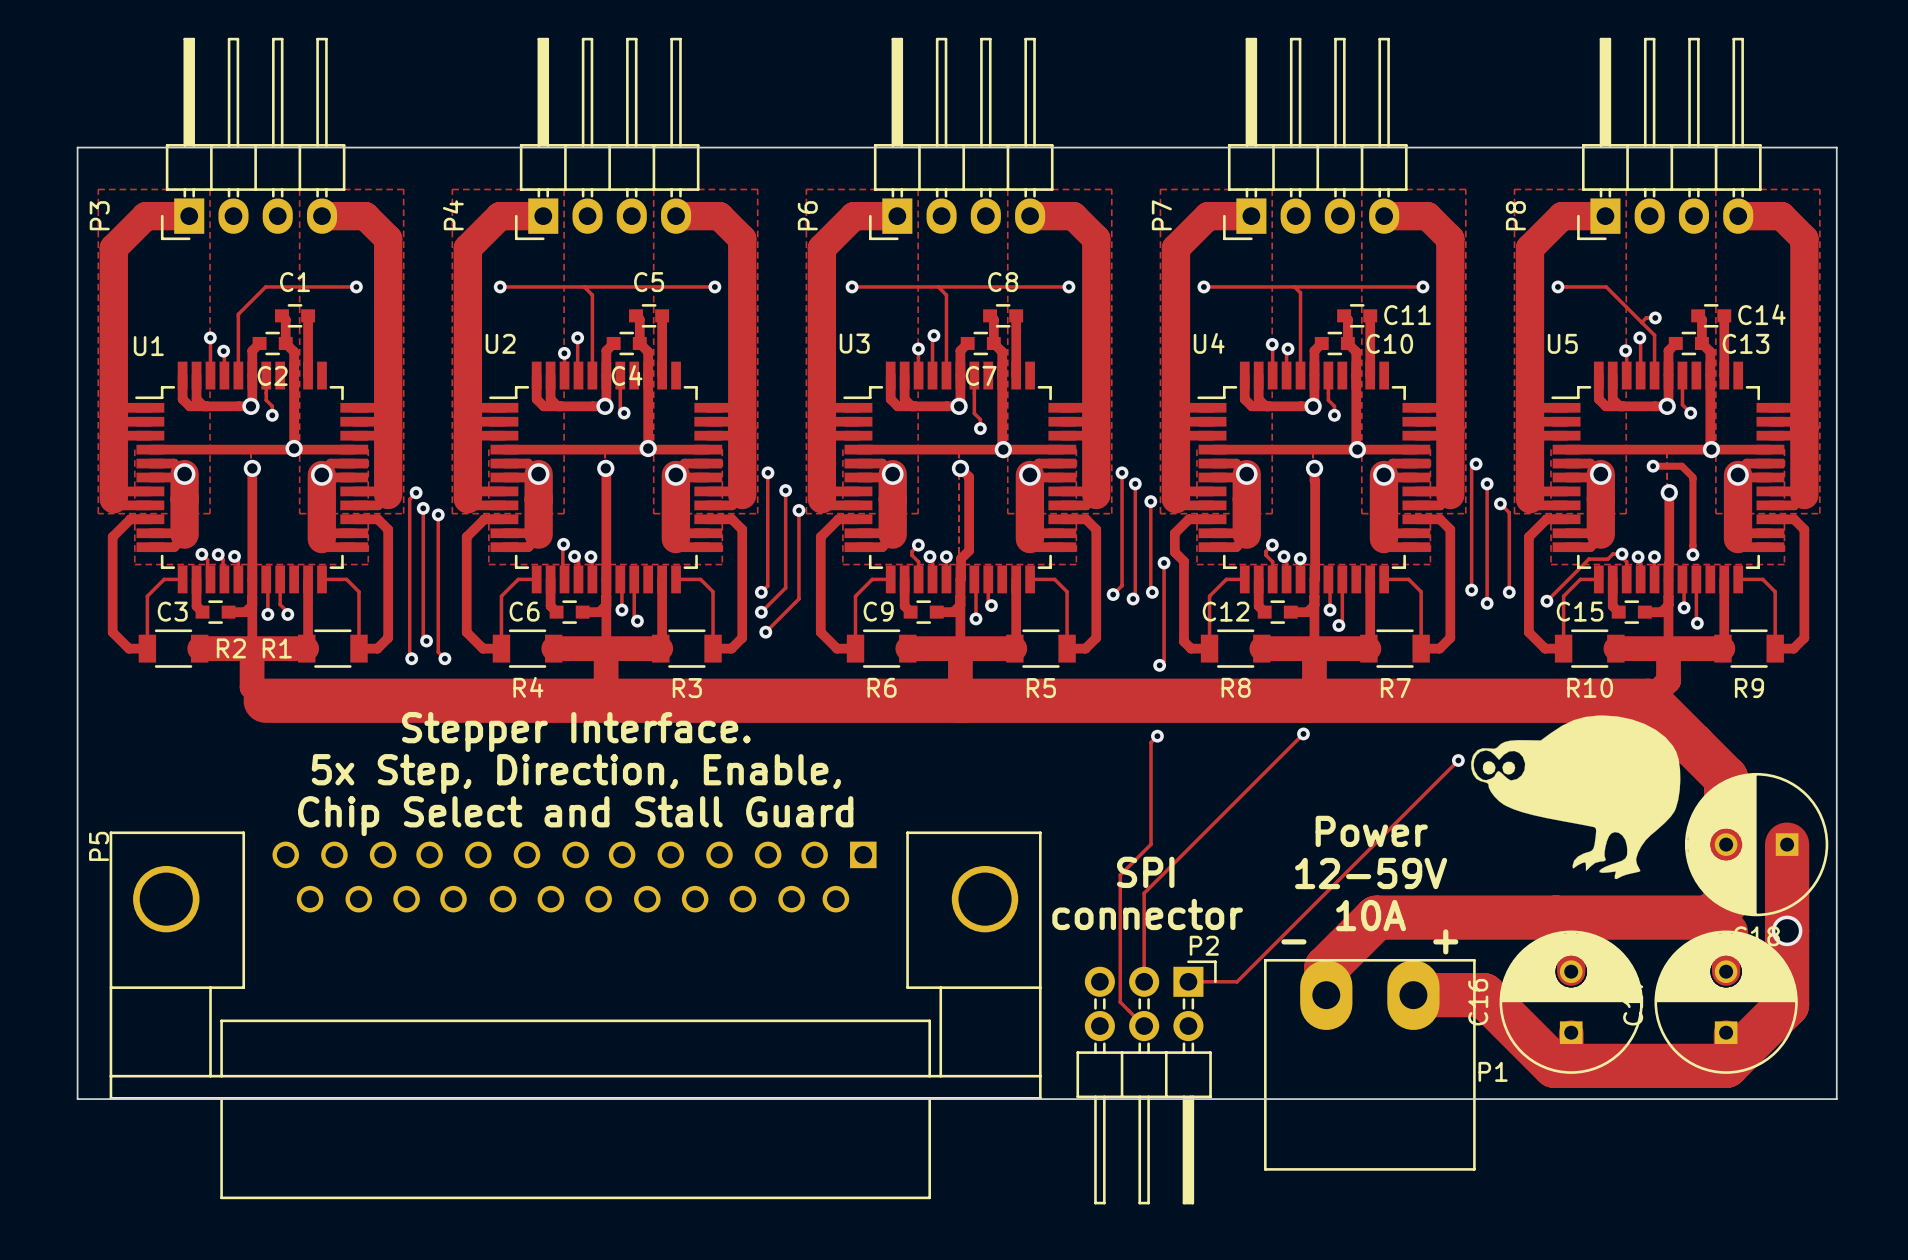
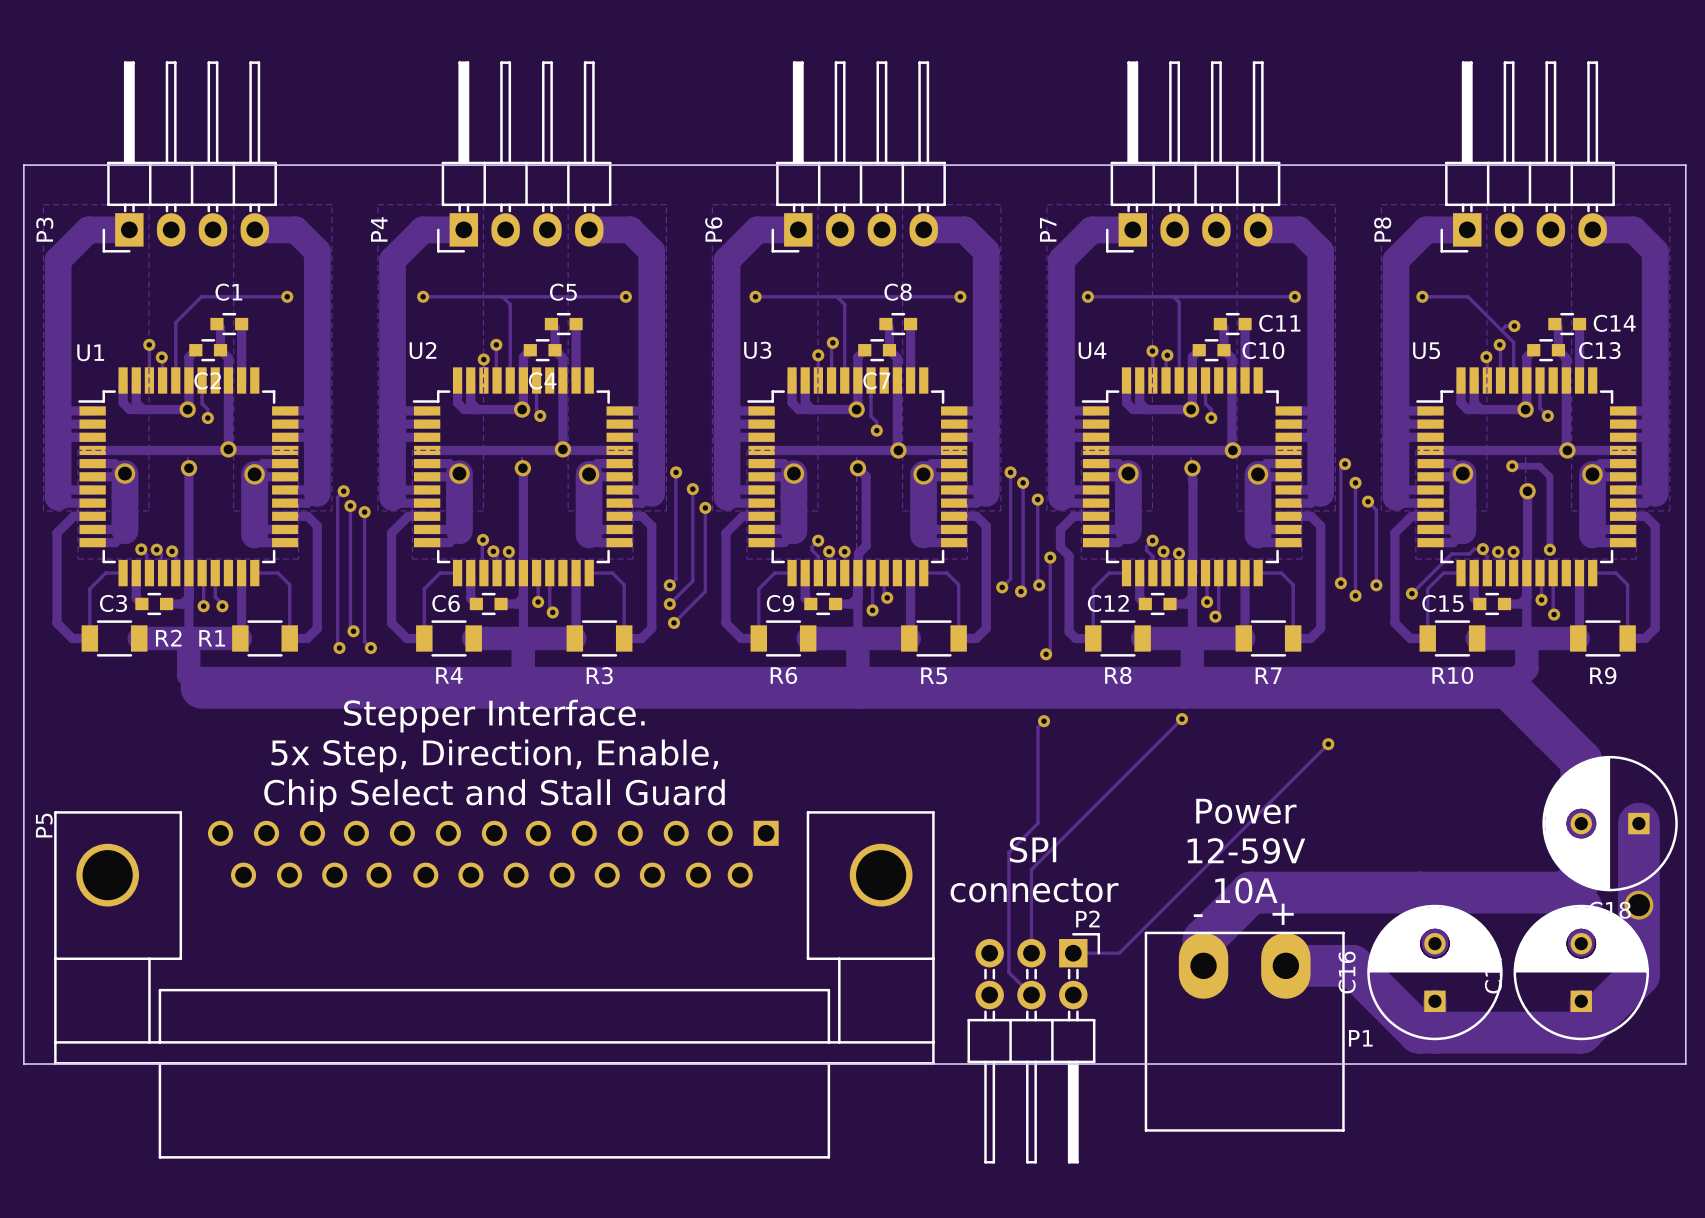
drawing: [1471, 715, 1681, 880] -> none

